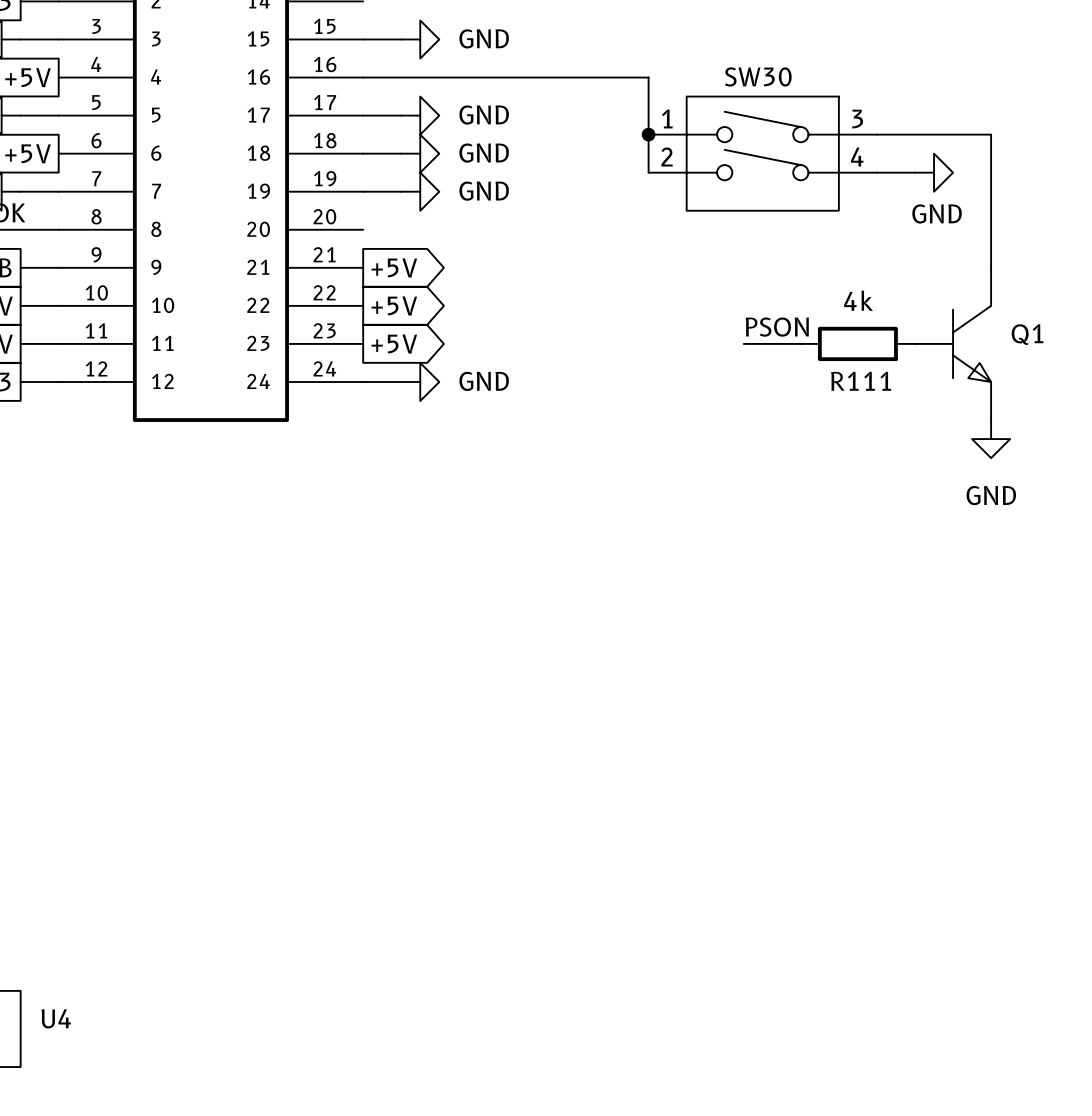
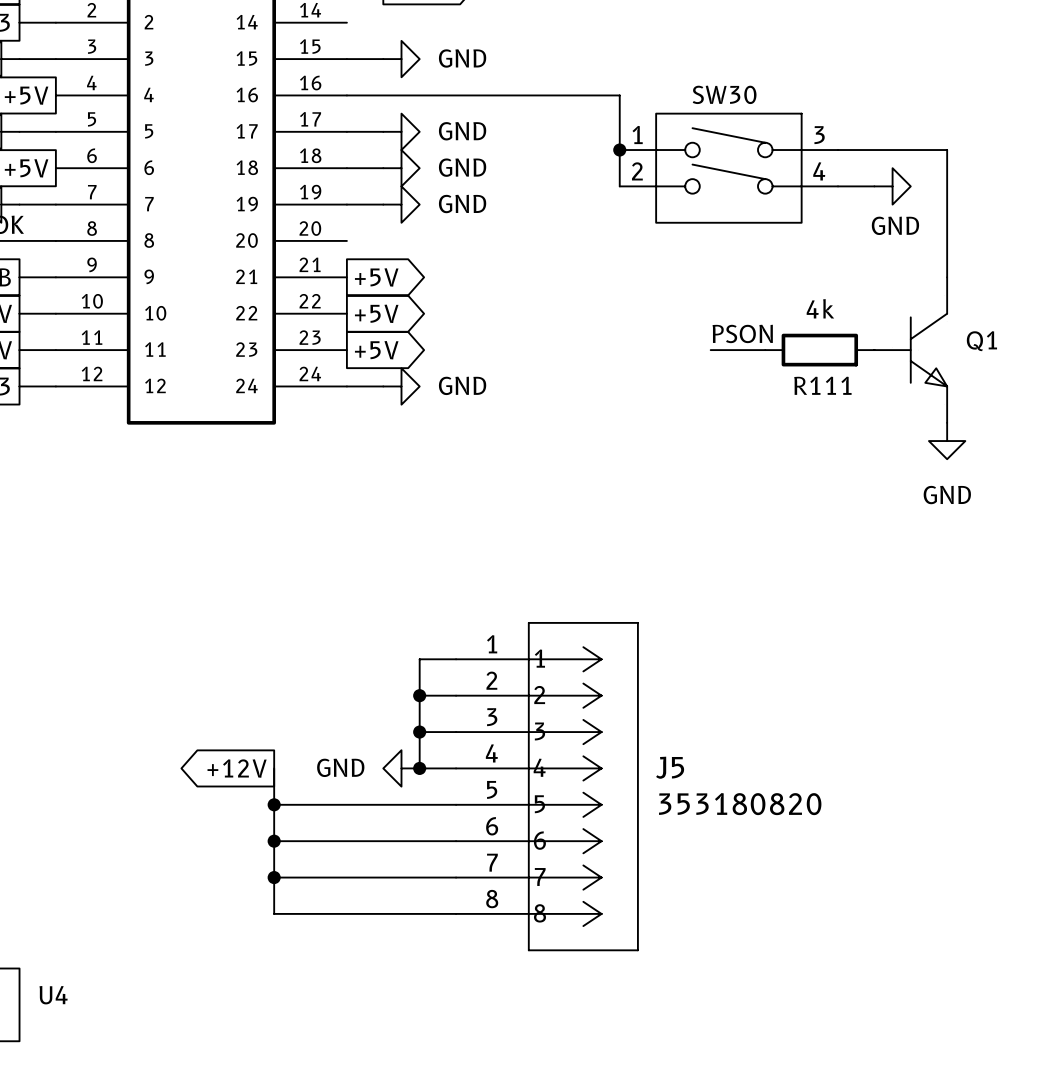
wire: none -> (456, 659) (419, 659) (419, 768) (456, 768)
wire: none -> (419, 695) (456, 695)
junction: none -> (419, 695)
wire: none -> (419, 732) (456, 732)
junction: none -> (419, 732)
global label: none -> +12V (237, 768)
wire: none -> (274, 768) (274, 913) (456, 913)
power symbol: none -> GND (401, 768)
junction: none -> (419, 768)
J5: none -> 353180820 (547, 786)
wire: none -> (274, 804) (456, 804)
junction: none -> (274, 804)
wire: none -> (274, 841) (456, 841)
junction: none -> (274, 841)
wire: none -> (274, 877) (456, 877)
junction: none -> (274, 877)

